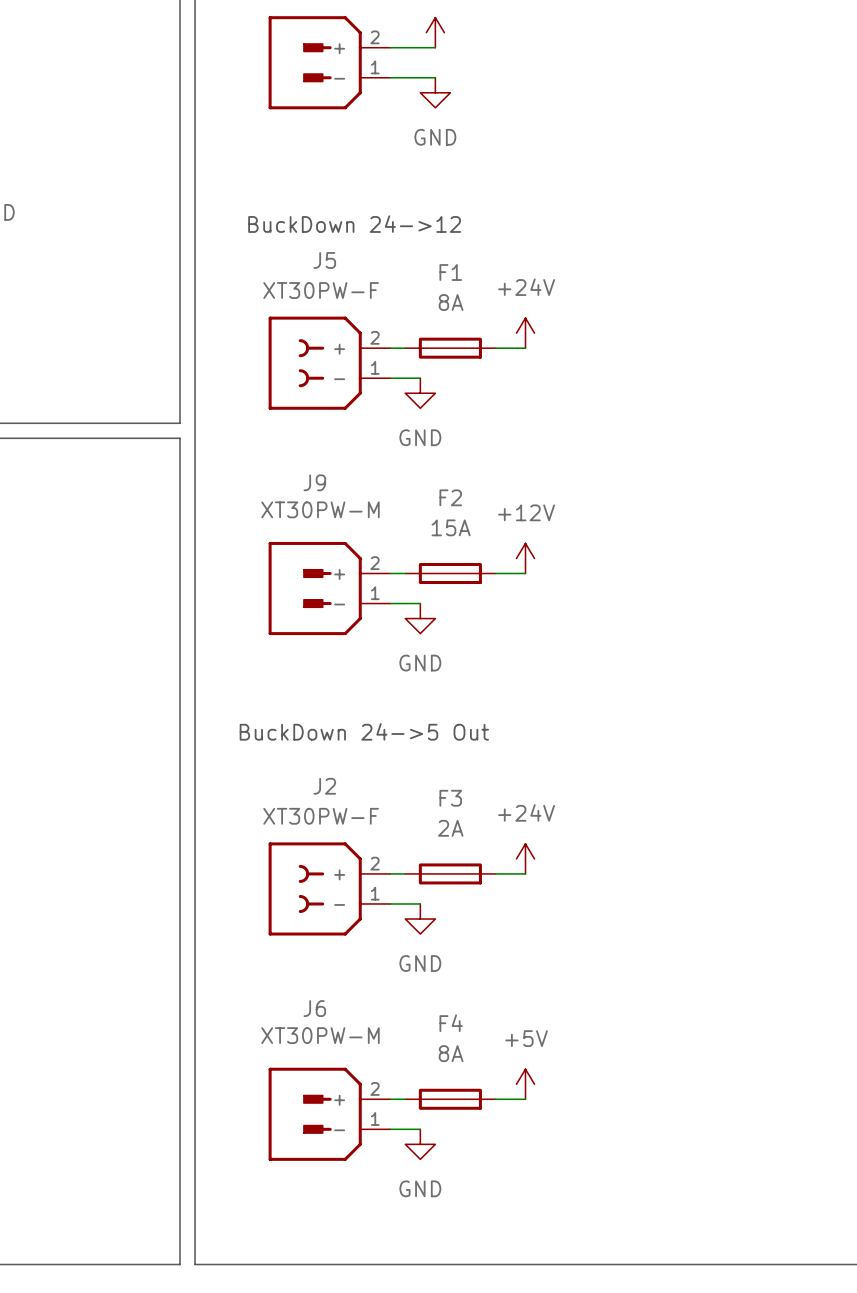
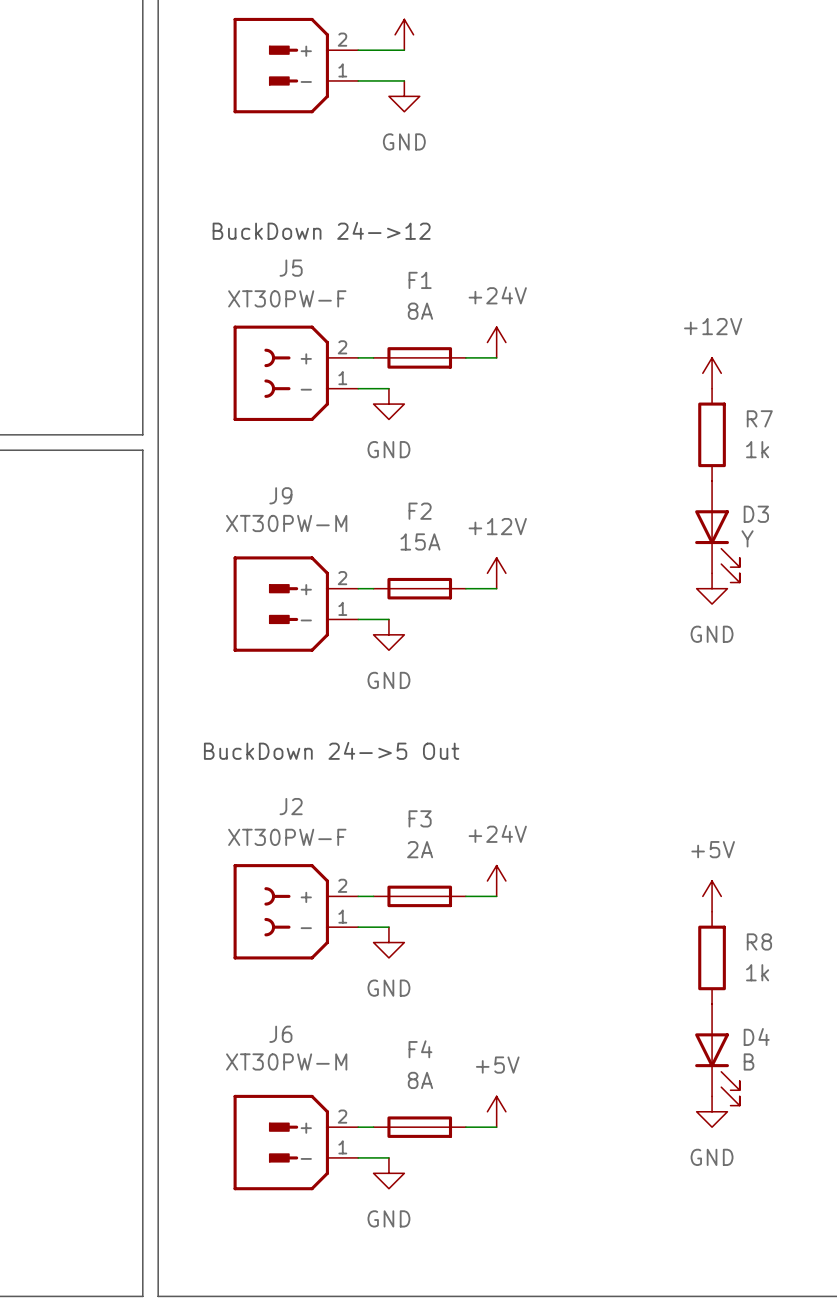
power symbol: none -> +12V (712, 373)
R7: none -> 1k (712, 434)
D3: none -> Y (717, 531)
power symbol: none -> GND (712, 588)
power symbol: none -> +5V (712, 896)
R8: none -> 1k (712, 957)
D4: none -> B (717, 1054)
power symbol: none -> GND (712, 1111)

